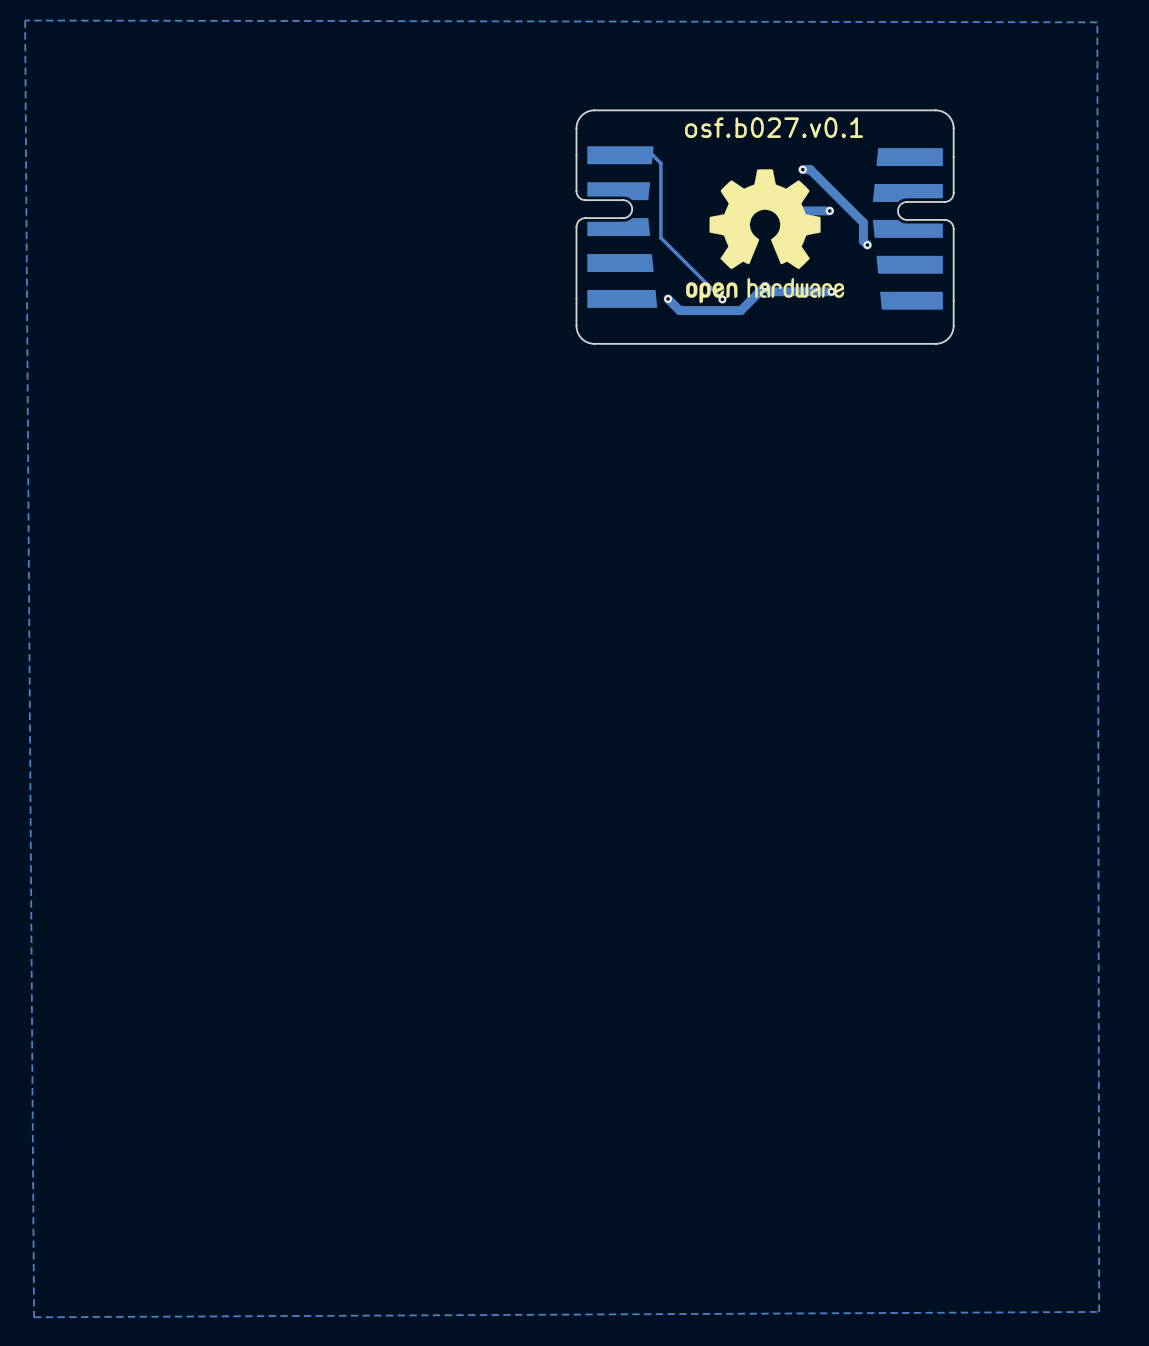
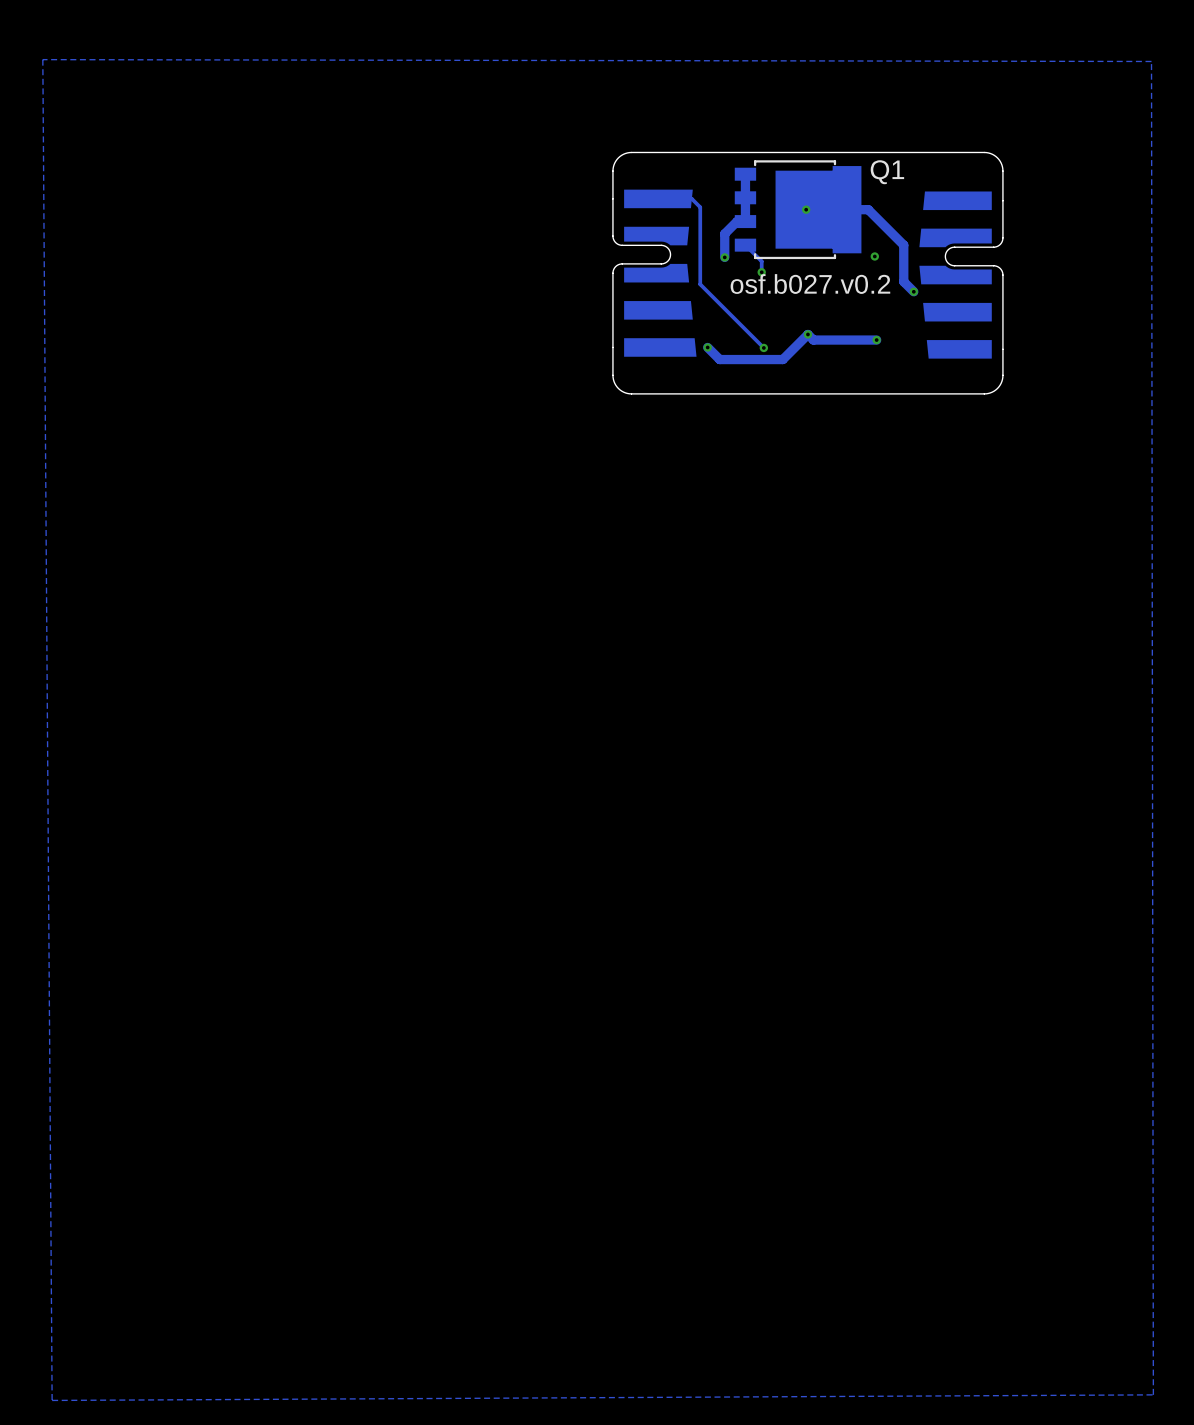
text: osf.b027.v0.1 (774, 127) -> none
track: none -> (745, 174) (745, 221) (737, 221) (724, 233) (724, 257)
Q1: none -> (798, 209)
via: none -> (806, 209)
drawing: [686, 169, 845, 304] -> none
track: (802, 169) (810, 169) (863, 222) (863, 241) -> (806, 209) (868, 209) (903, 245) (903, 281) (909, 287)
via: (802, 169) -> none
track: none -> (745, 245) (761, 261) (761, 272)
track: (829, 210) (786, 210) -> none
via: none -> (724, 257)
via: none -> (761, 272)
text: none -> osf.b027.v0.2 (810, 284)

